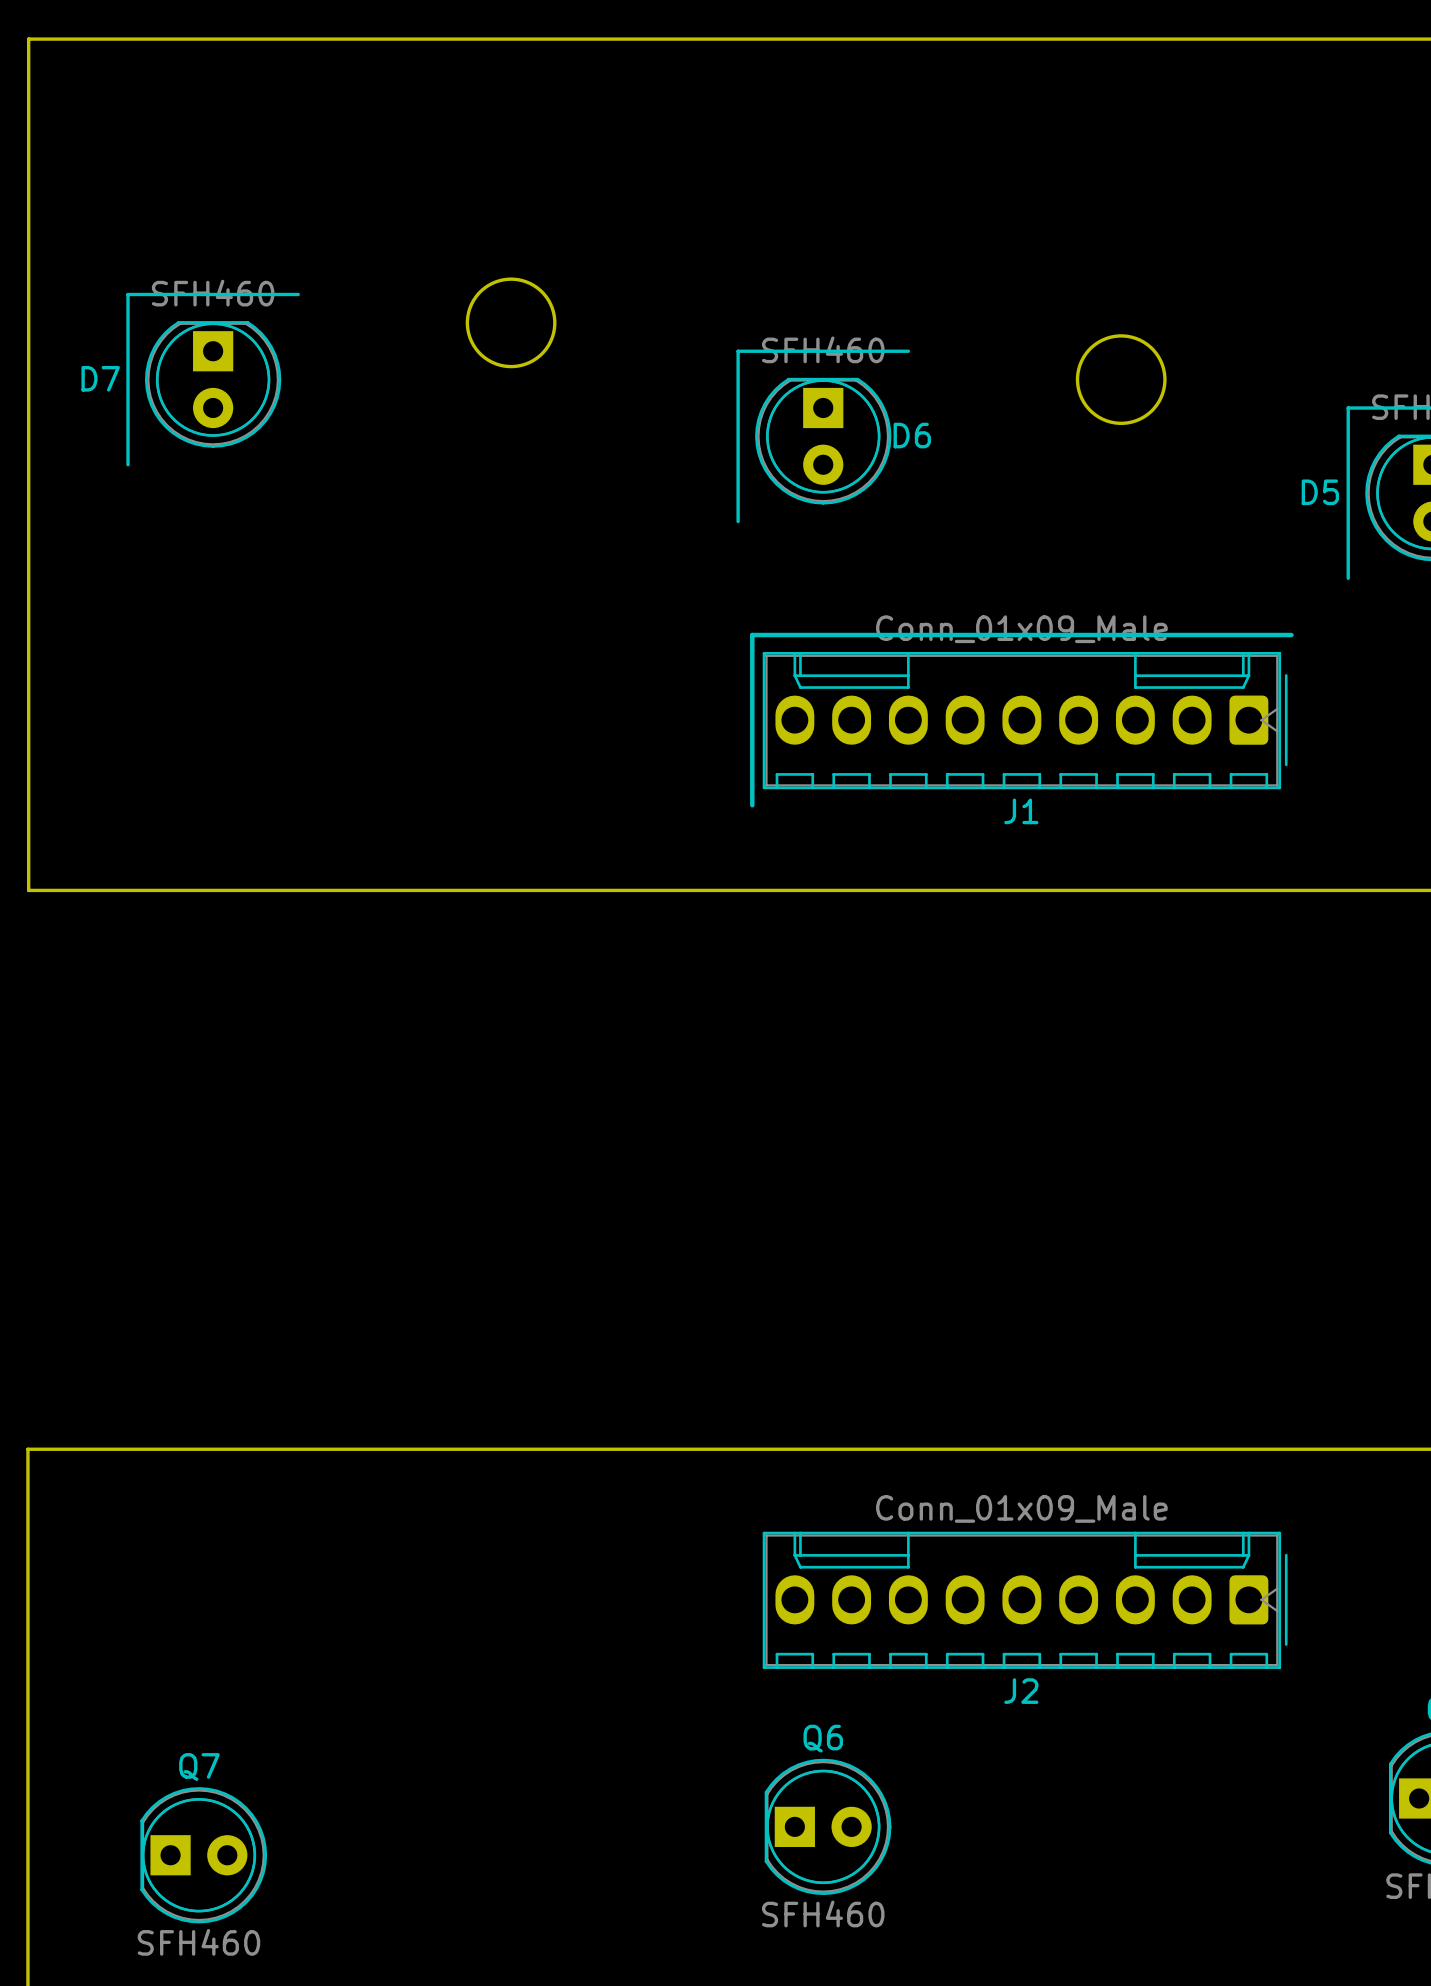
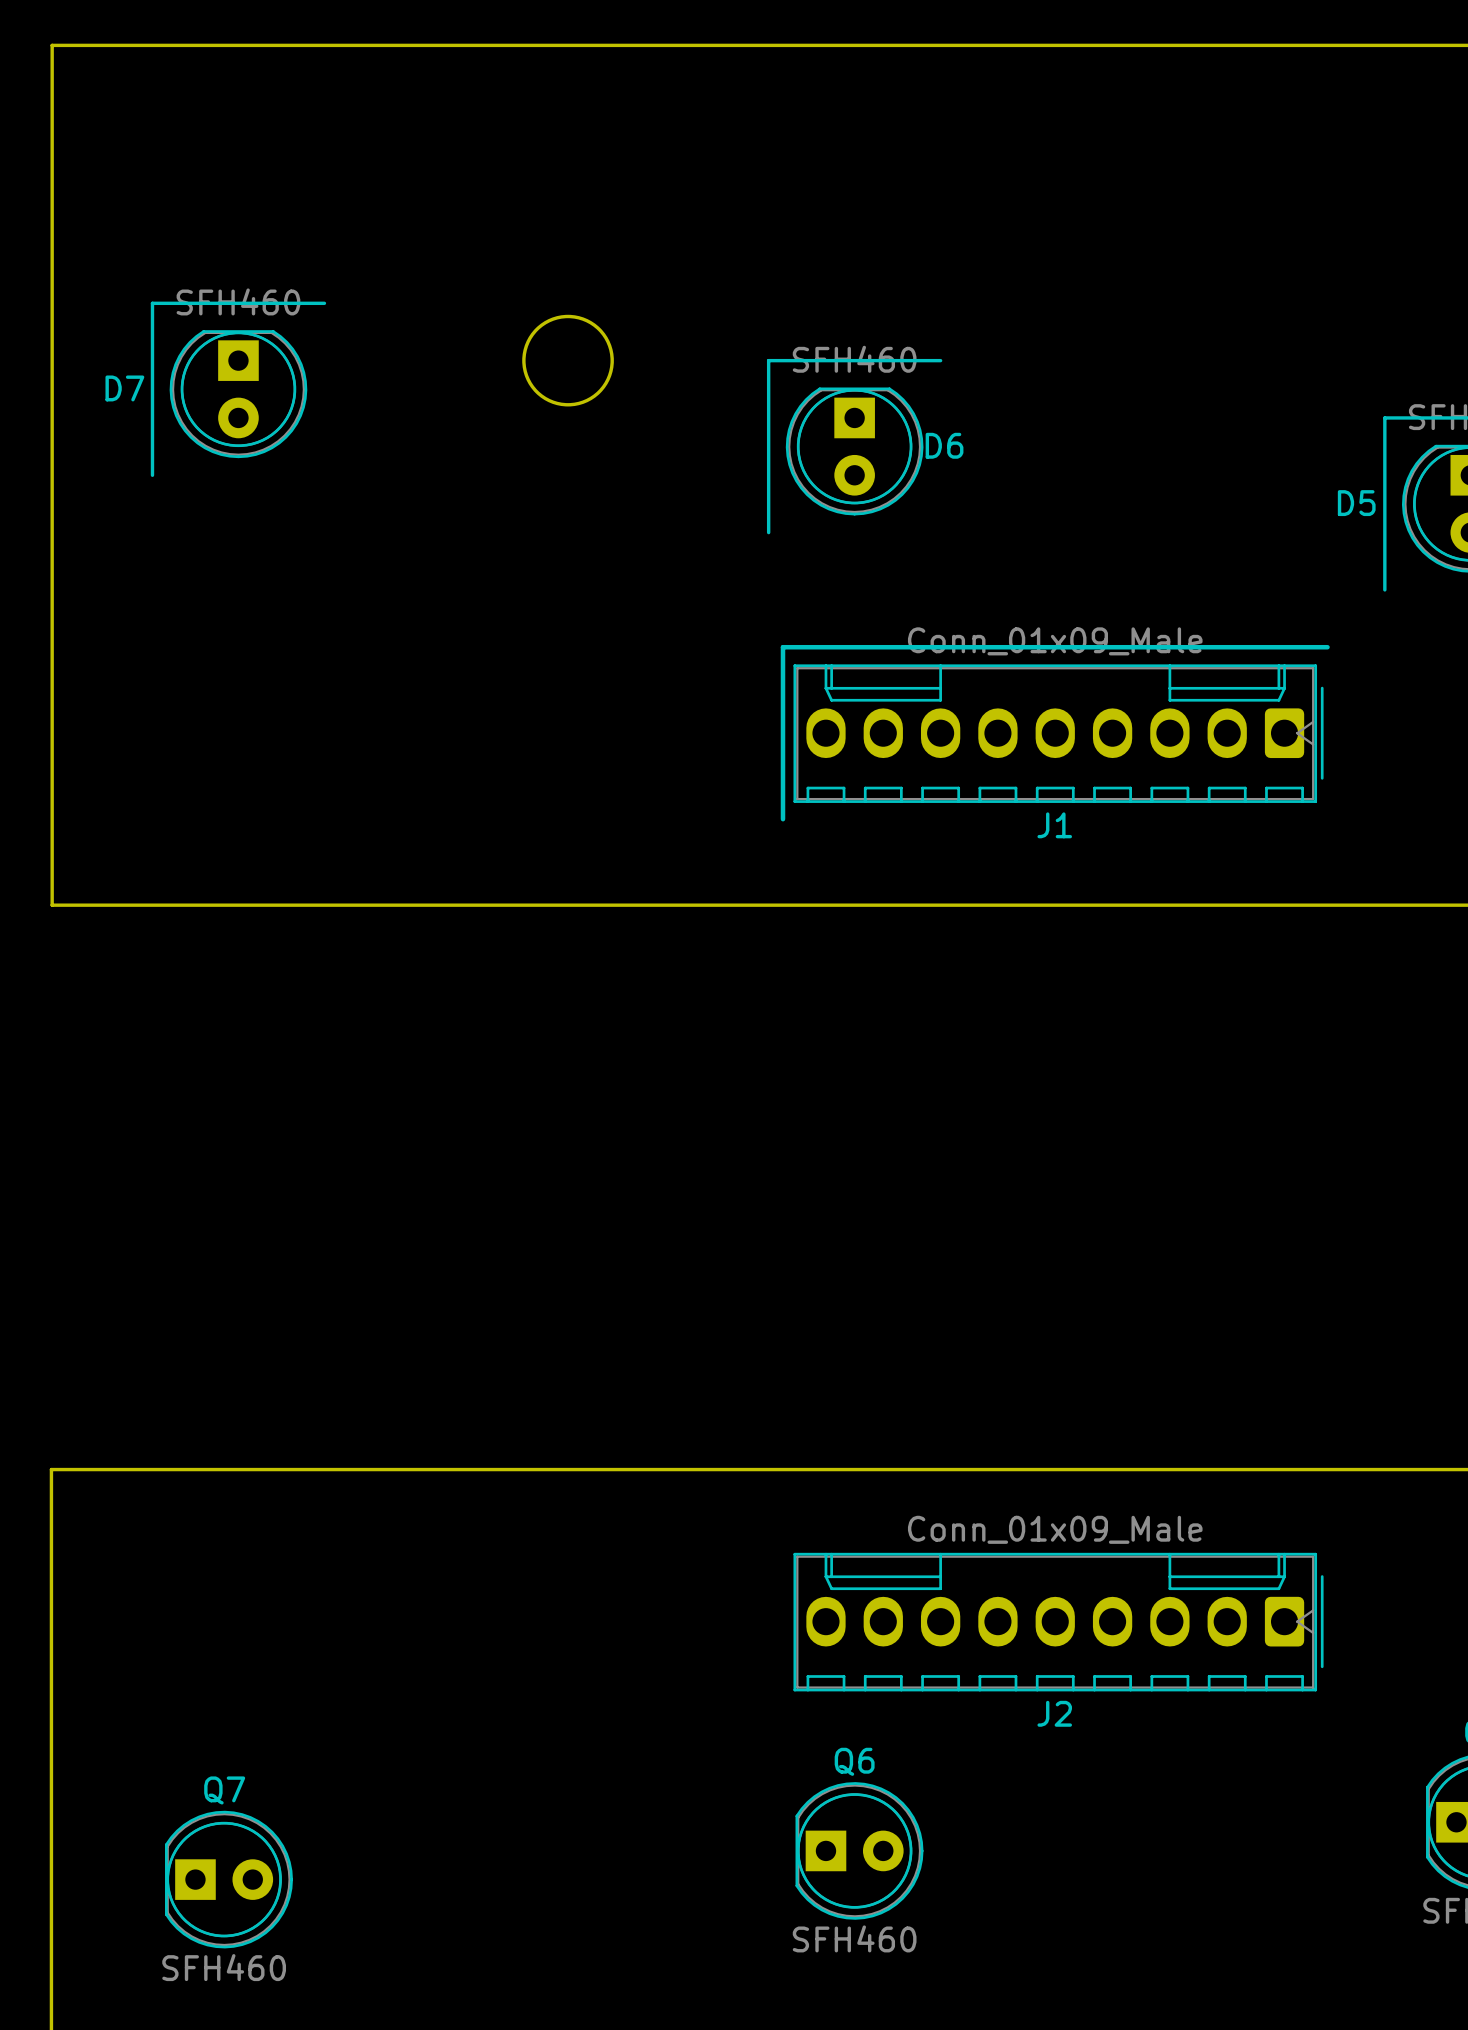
round board edge position: (511, 322) -> (568, 360)
round board edge: [1075, 334, 1167, 426] -> none

